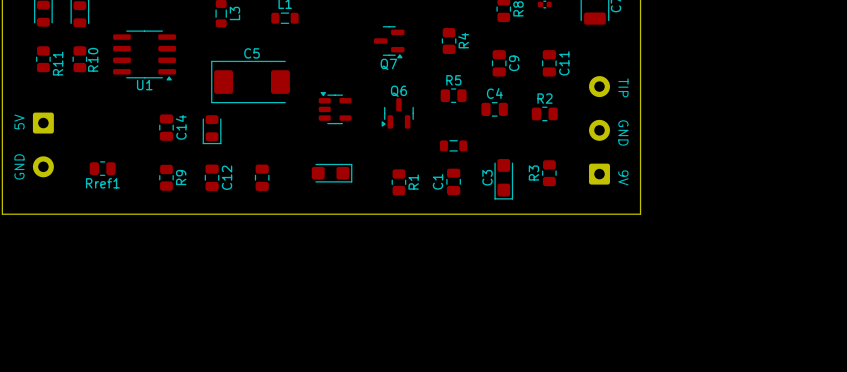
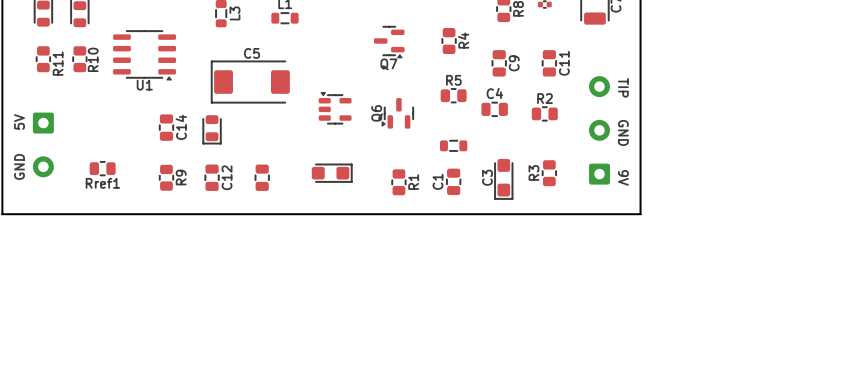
Q6 name rotation: 0° (398, 91) -> 90° counterclockwise (377, 113)
Q6 name position: Q6 (398, 91) -> Q6 (377, 113)

